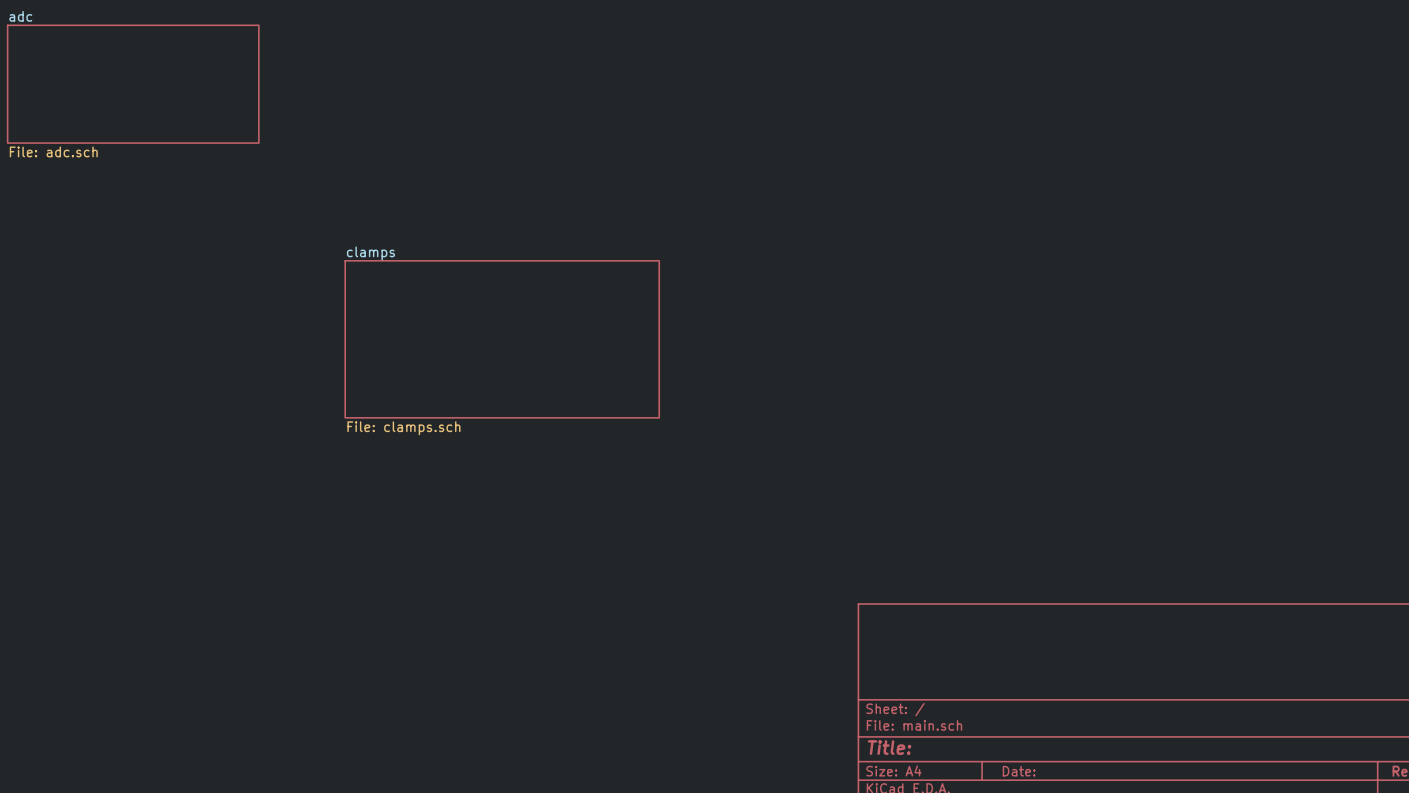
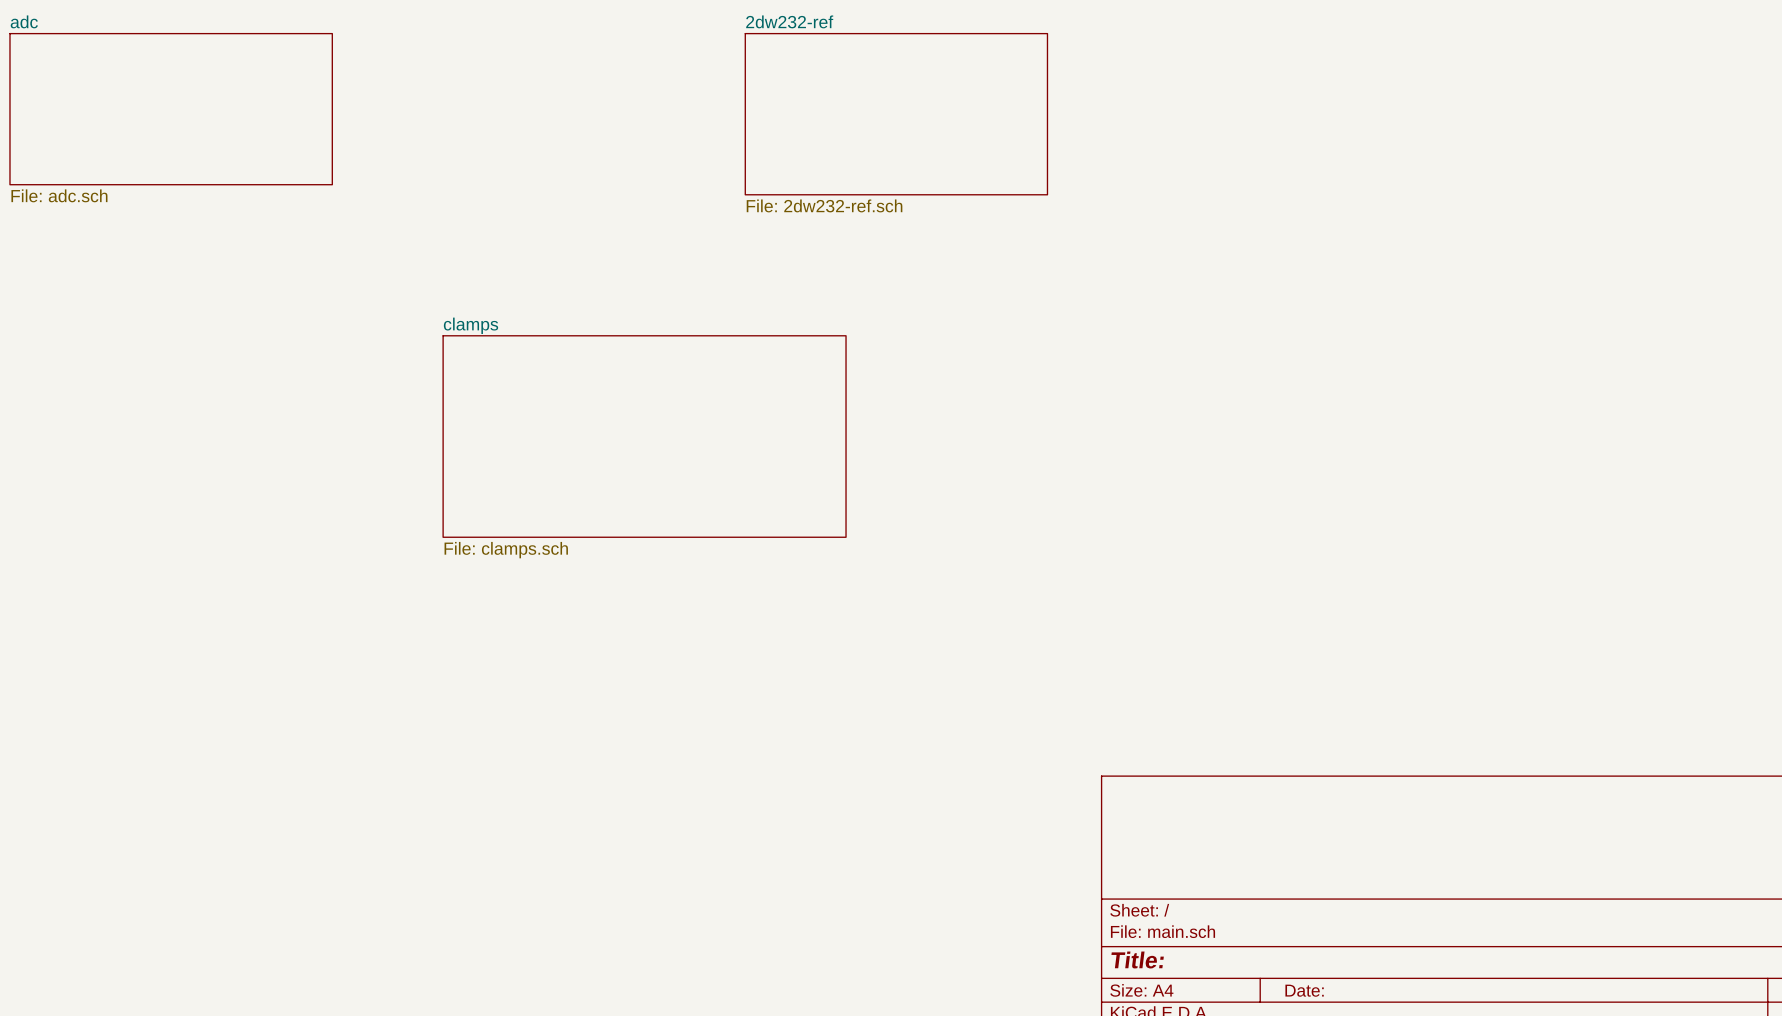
sheet 2dw232-ref: none -> File: 2dw232-ref.sch (896, 114)

